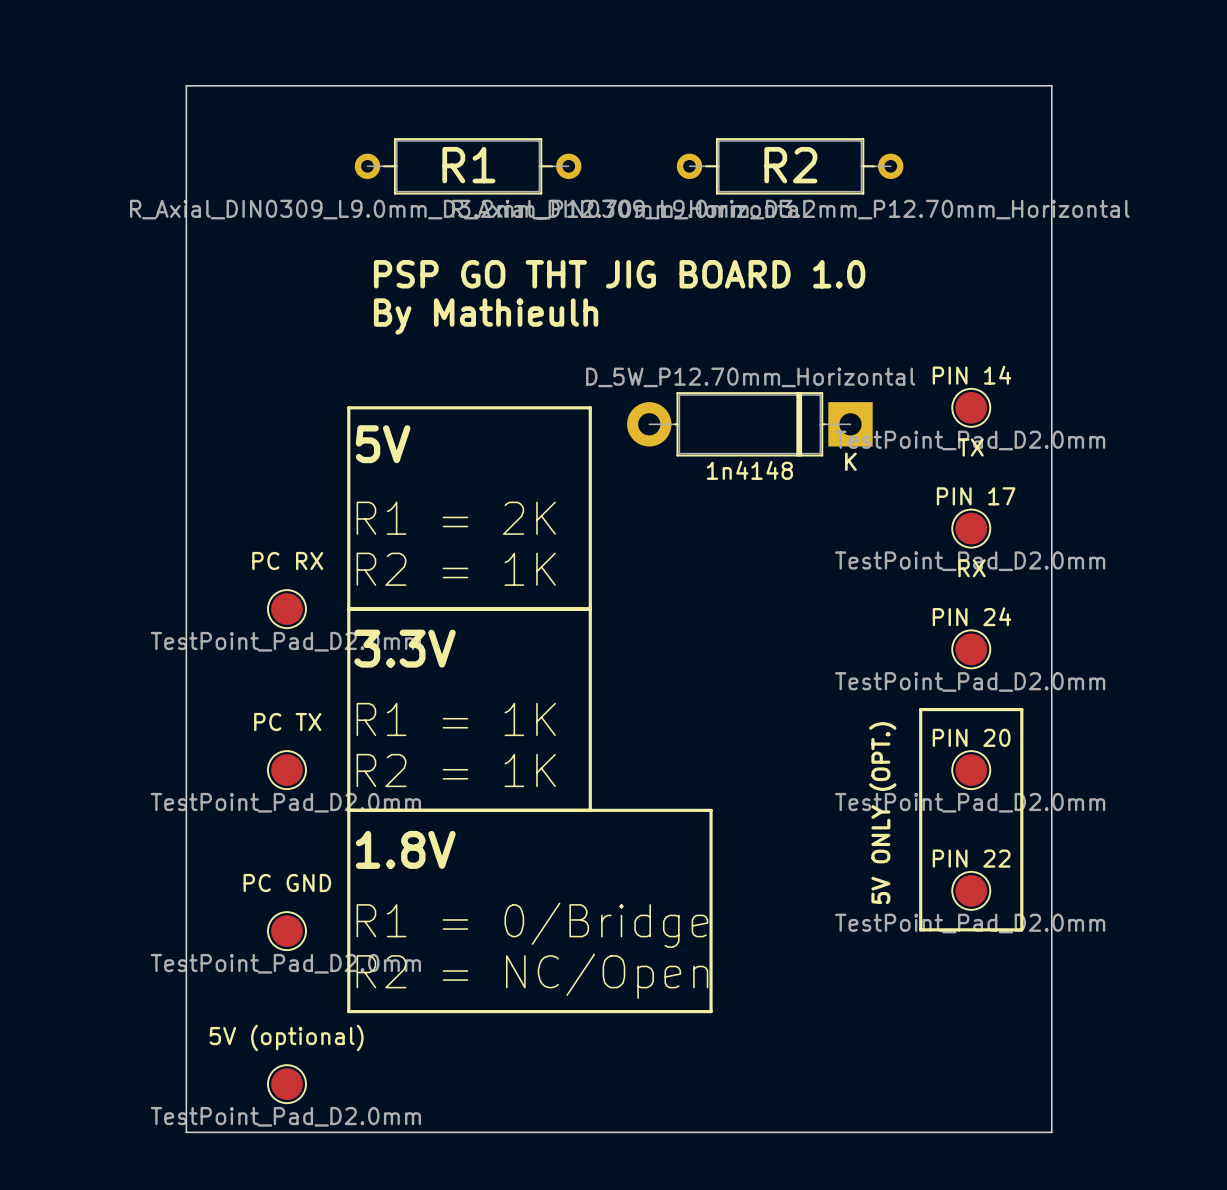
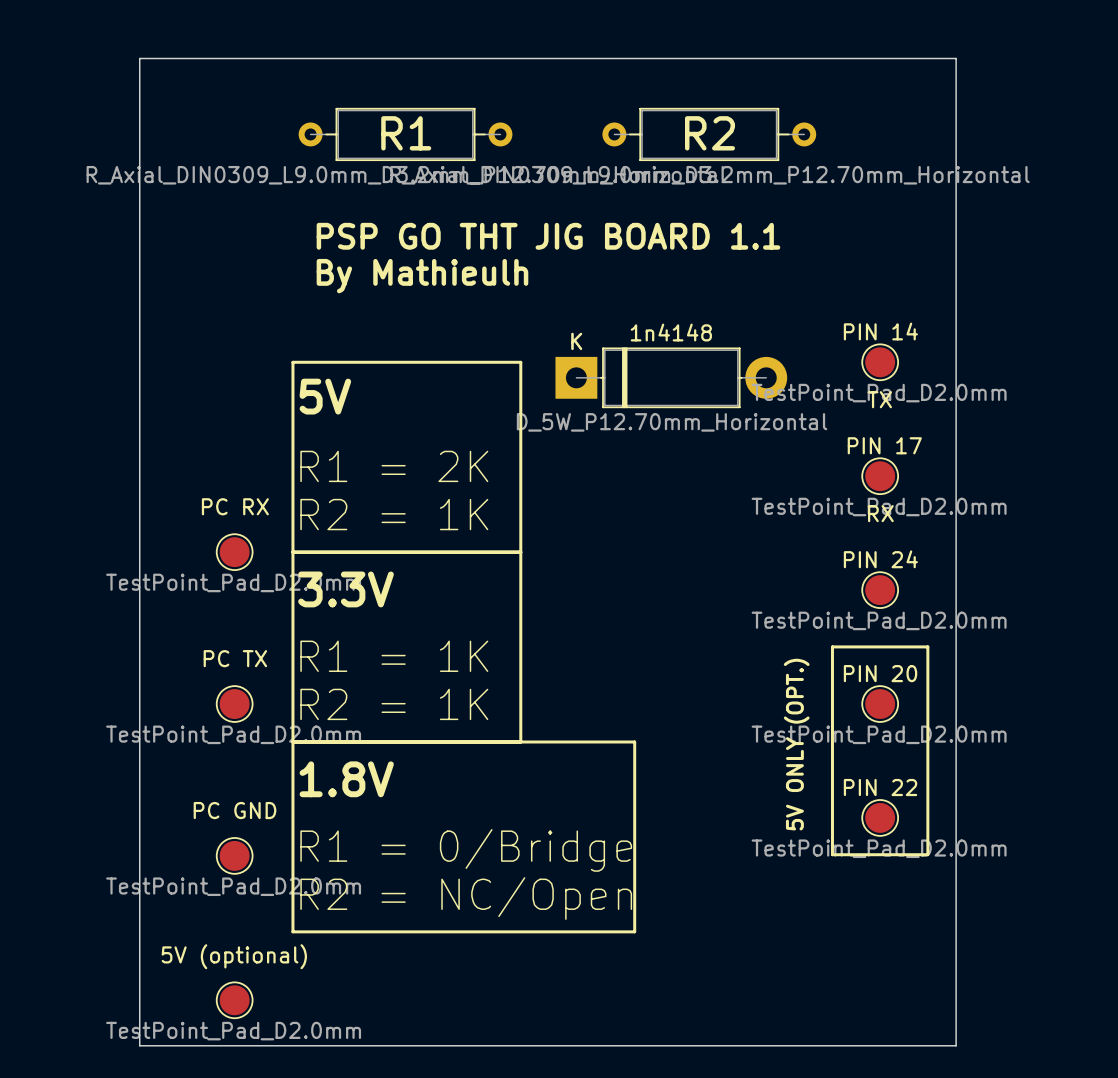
text: PSP GO THT JIG BOARD 1.0 (619, 274) -> PSP GO THT JIG BOARD 1.1 (548, 236)
1n4148 rotation: 0° (749, 424) -> 180° (671, 377)

